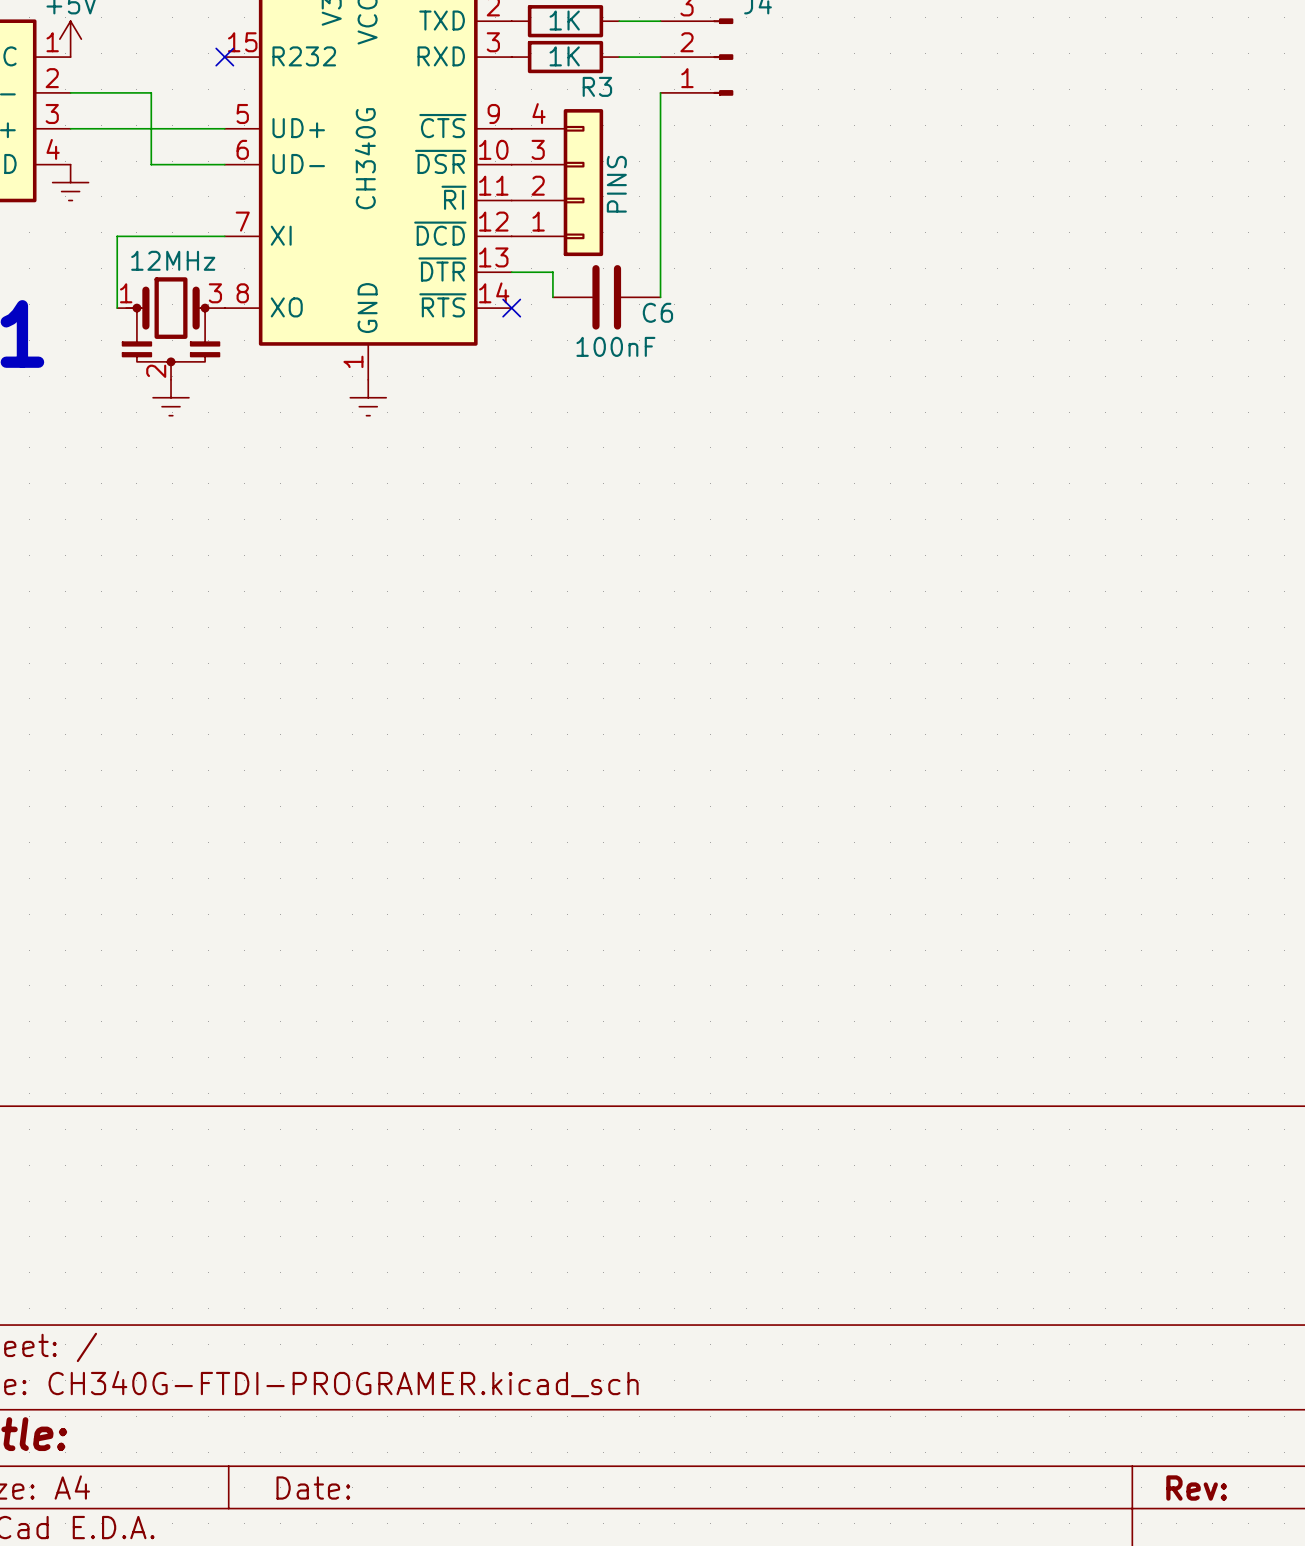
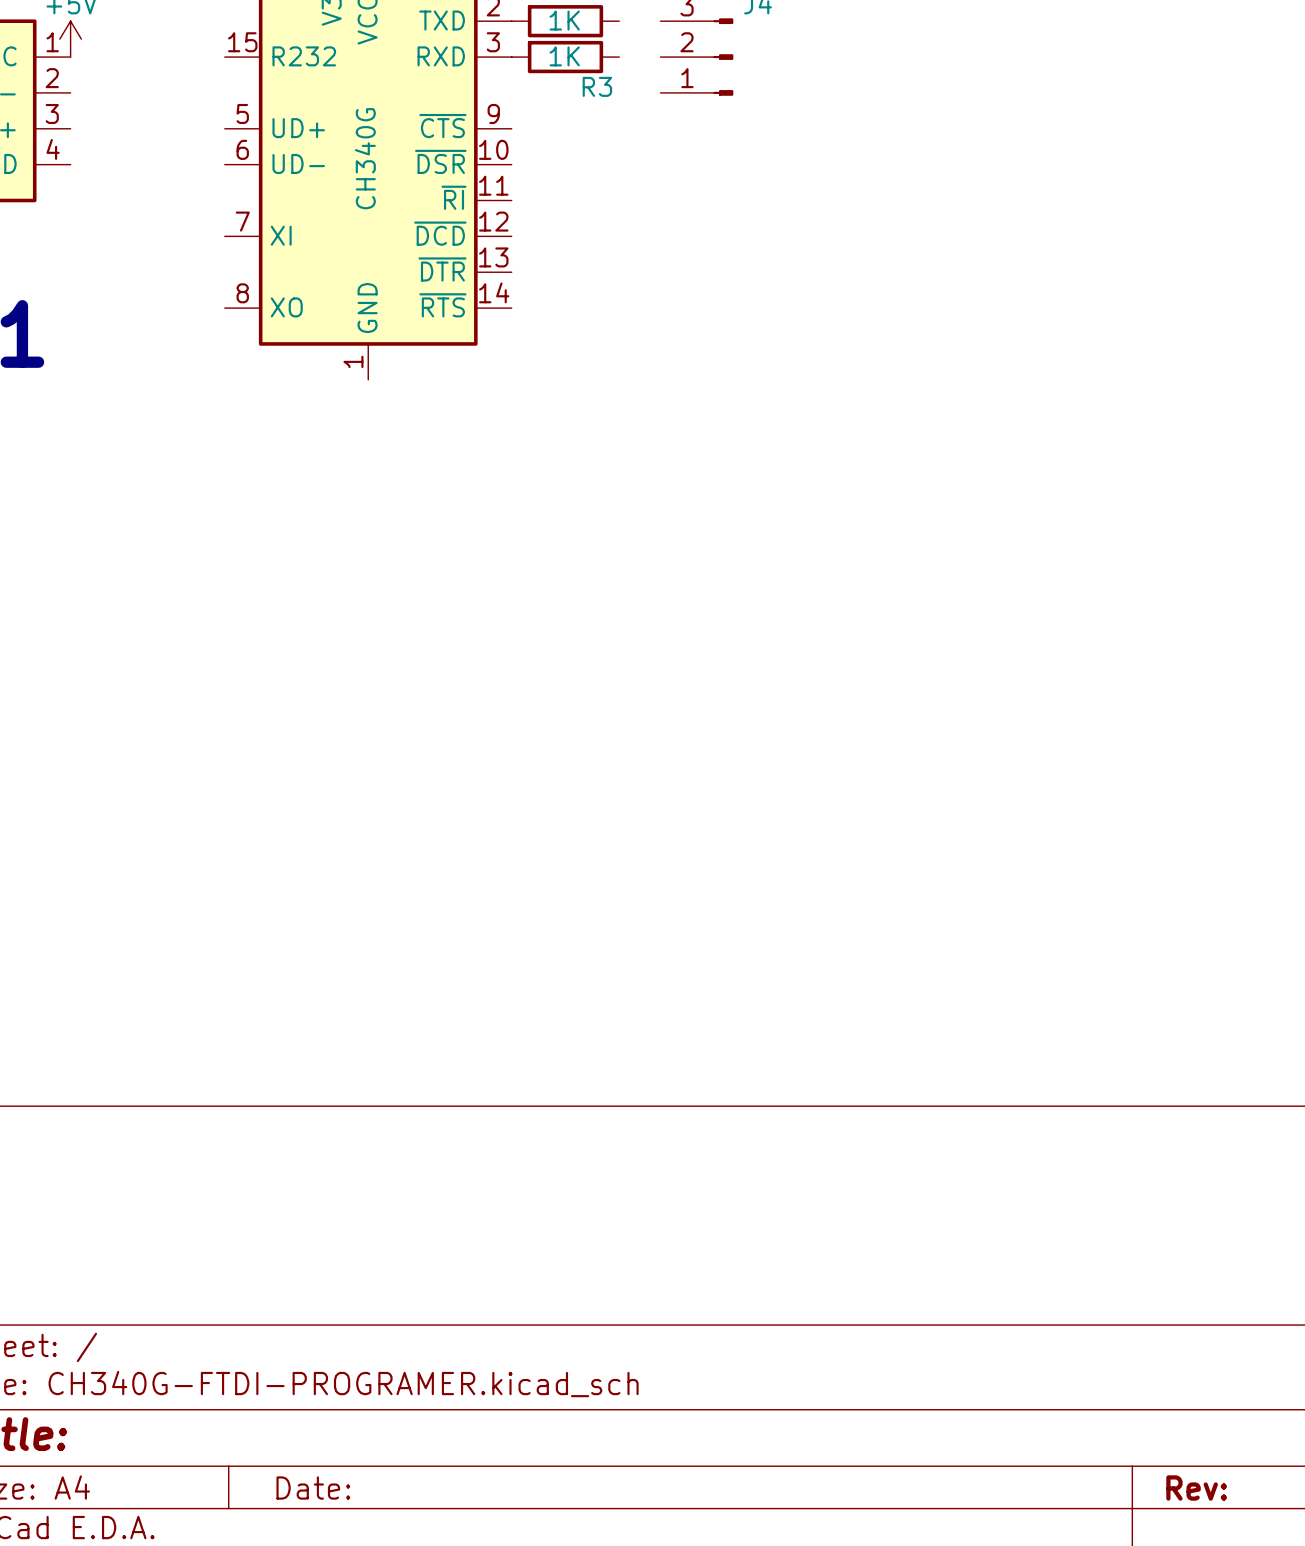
wire: (619, 21) (660, 21) -> none
no-connect mark: (224, 57) -> none
wire: (619, 57) (660, 57) -> none
wire: (70, 92) (151, 92) (151, 164) (224, 164) -> none
wire: (660, 92) (660, 297) -> none
wire: (70, 128) (224, 128) -> none
power symbol: (70, 182) -> none
part: PINS (557, 182) -> none
wire: (224, 236) (117, 236) (117, 308) -> none
wire: (511, 272) (552, 272) (552, 297) -> none
C6: 100nF (606, 297) -> none
no-connect mark: (511, 308) -> none
part: 12MHz (171, 328) -> none
power symbol: (171, 397) -> none
power symbol: (368, 397) -> none

